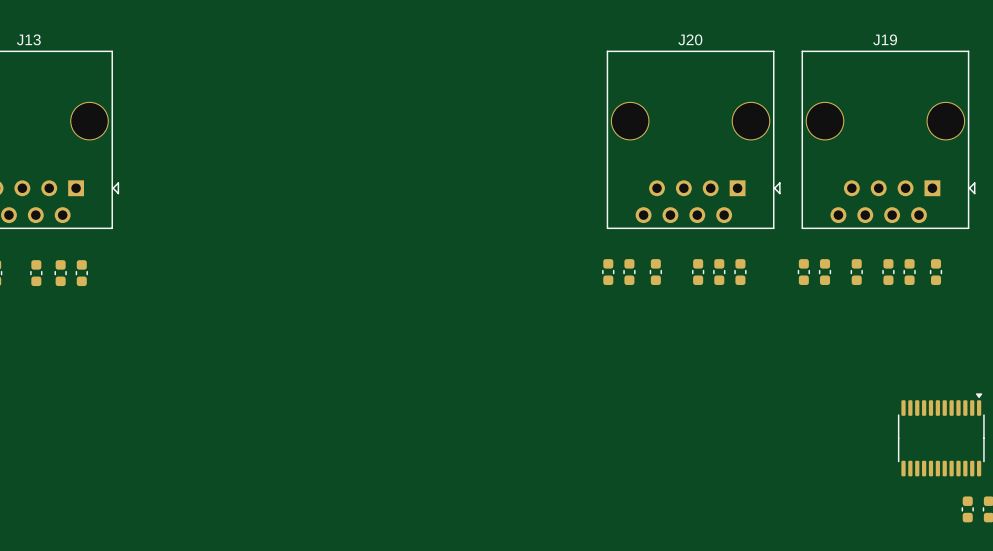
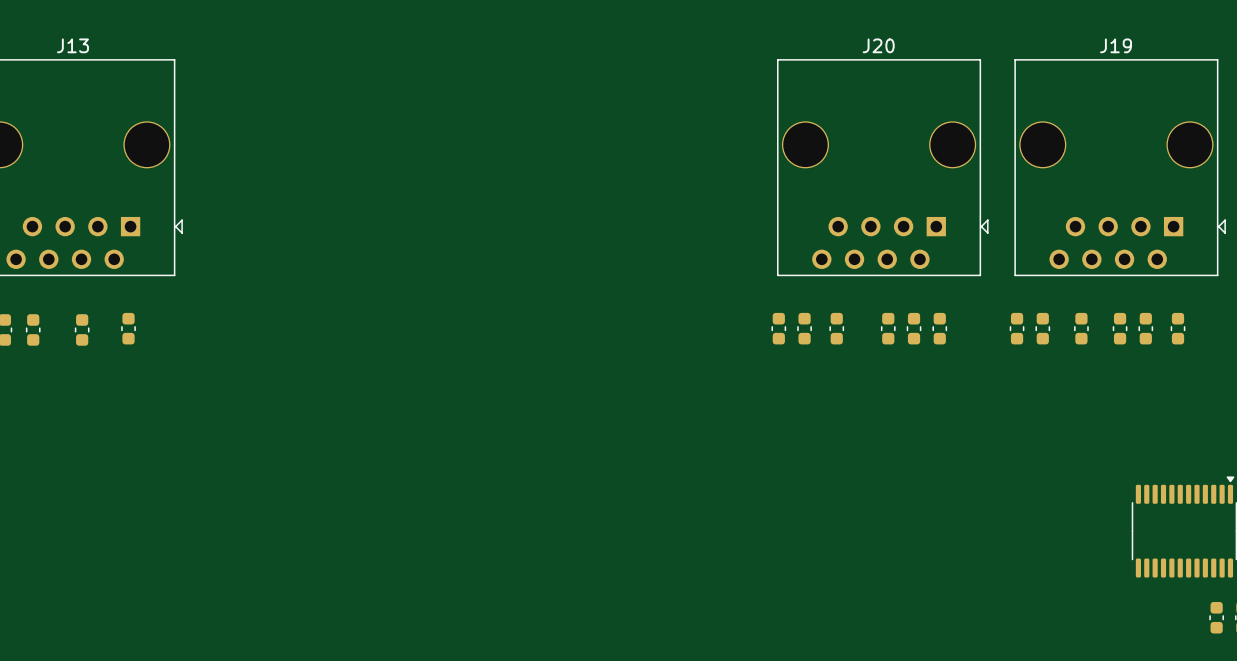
part: none -> (128, 328)
part: (60, 273) -> none
part: (81, 273) -> none

